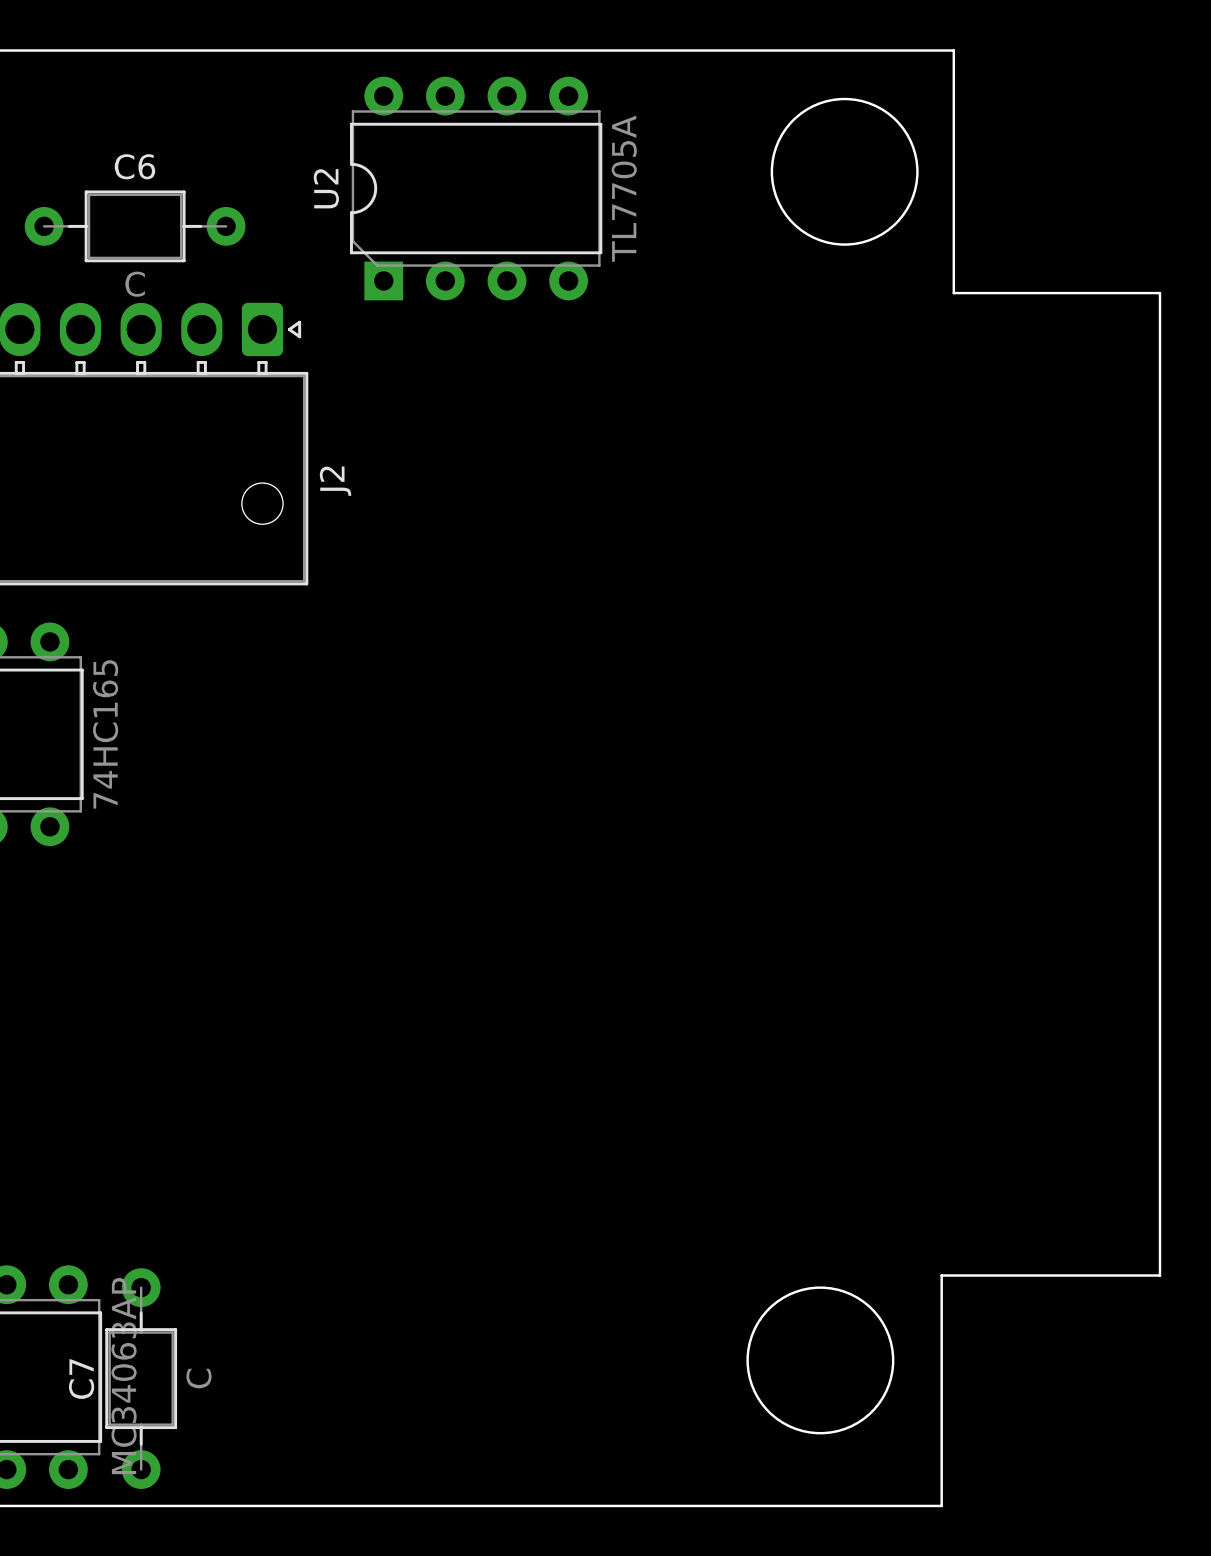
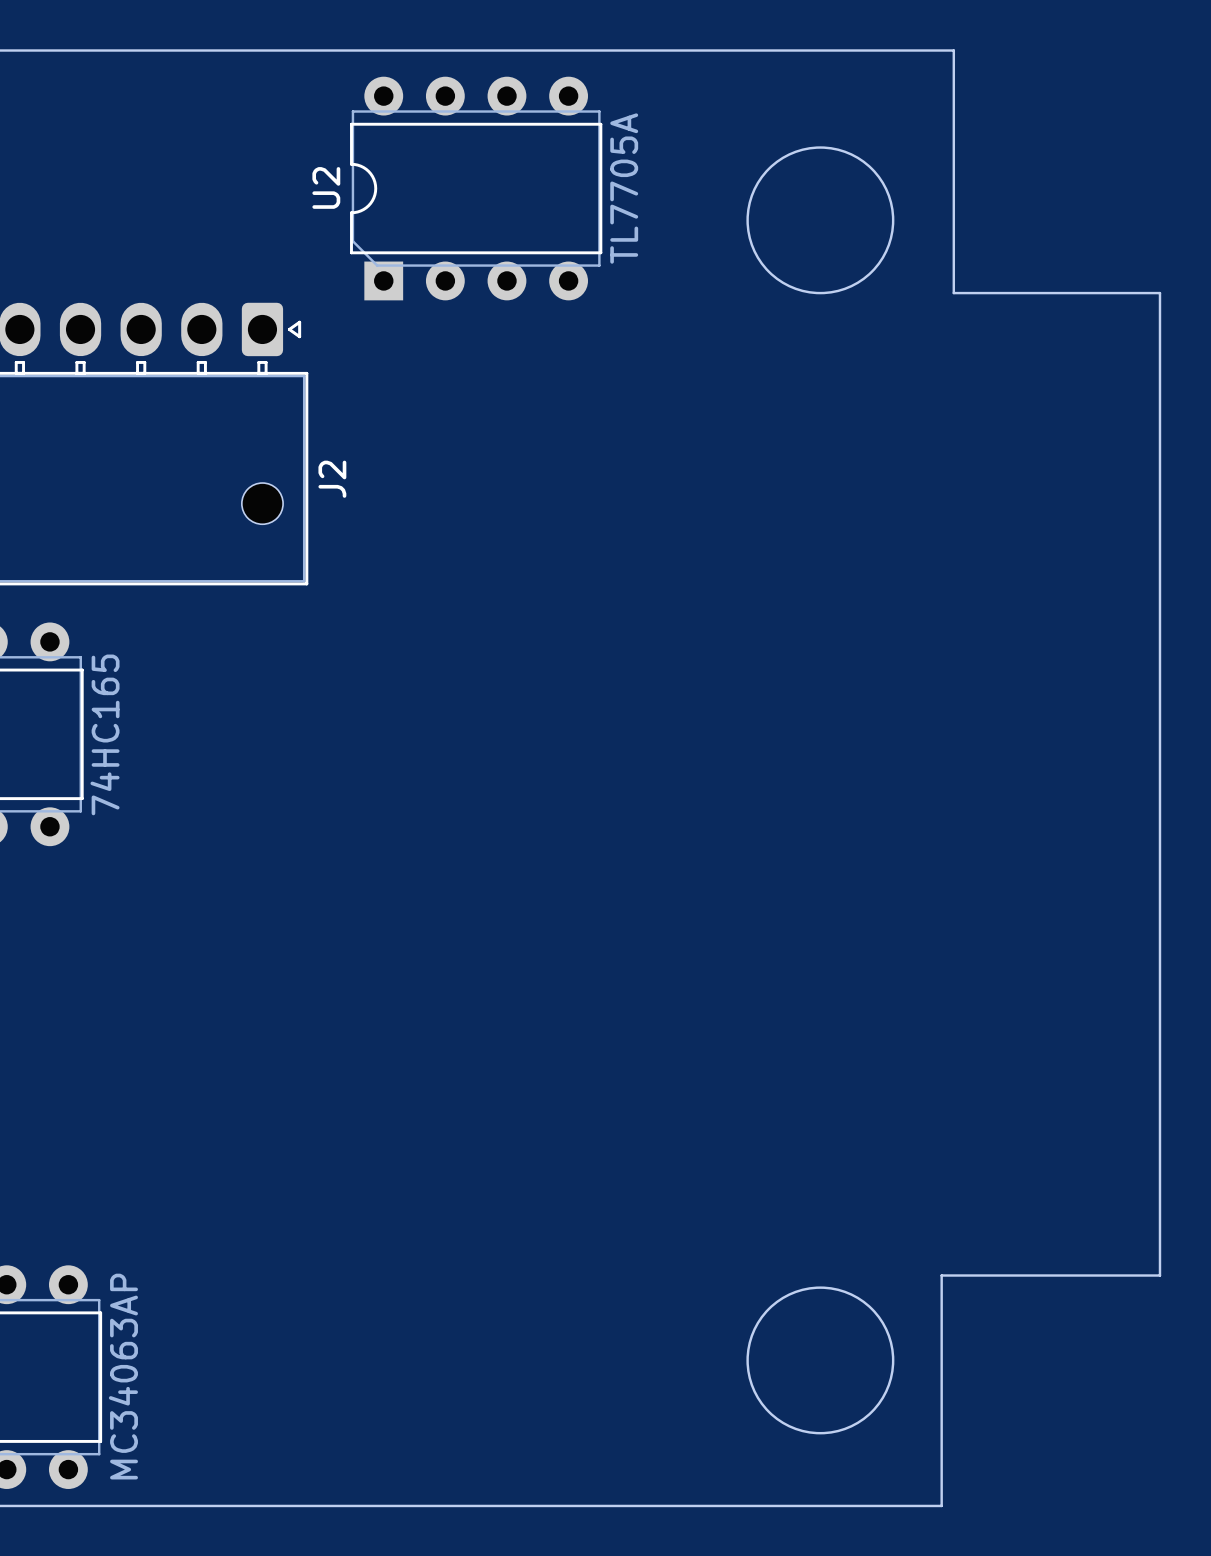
round board edge position: (844, 171) -> (820, 220)
C6: C (135, 226) -> none
C7: C (141, 1378) -> none

